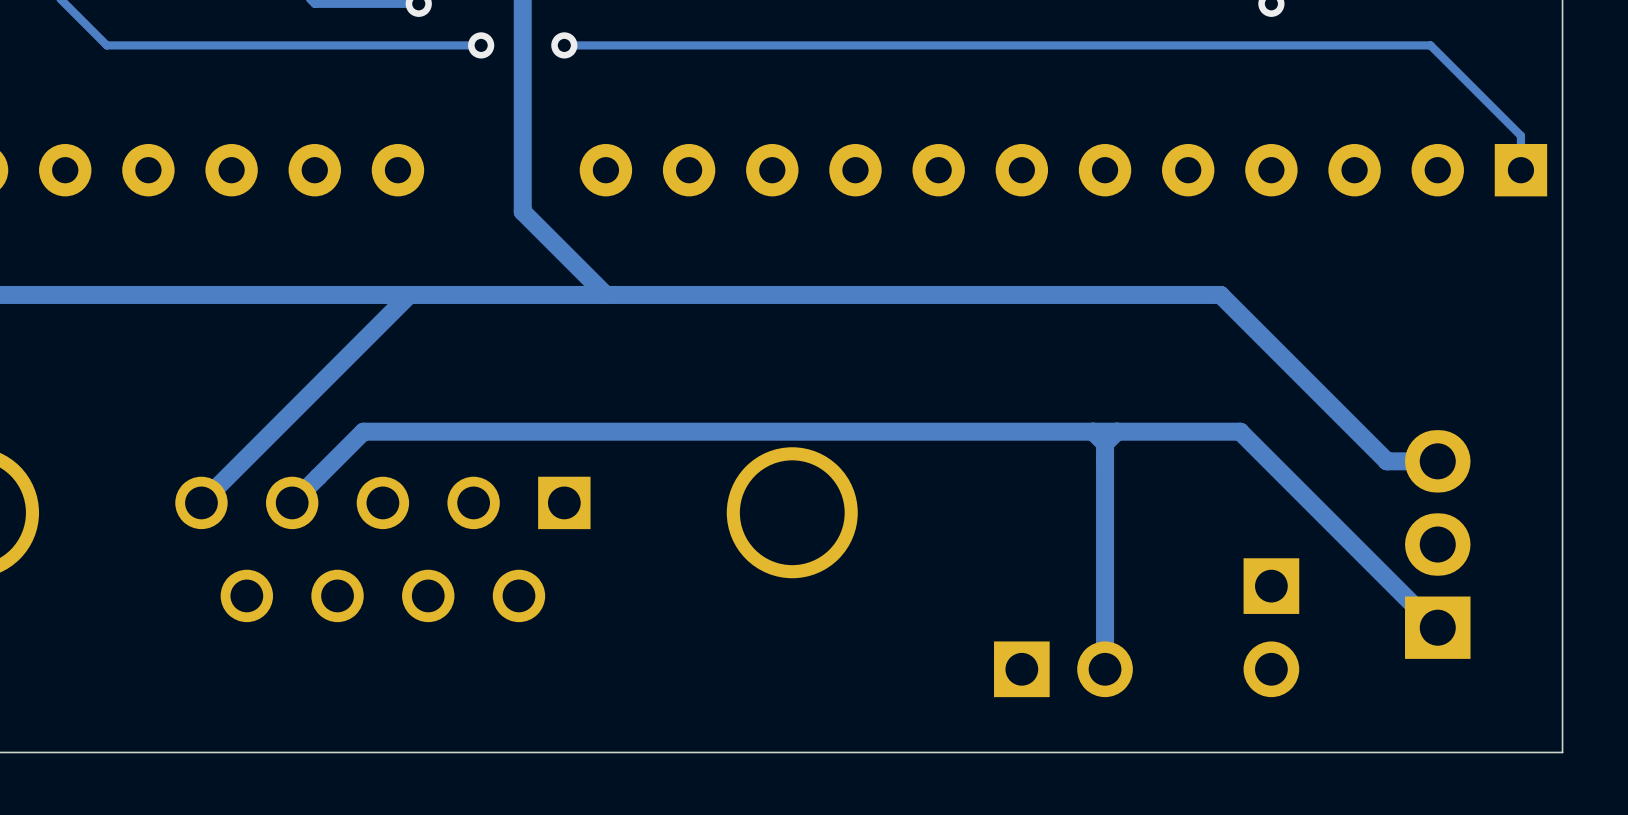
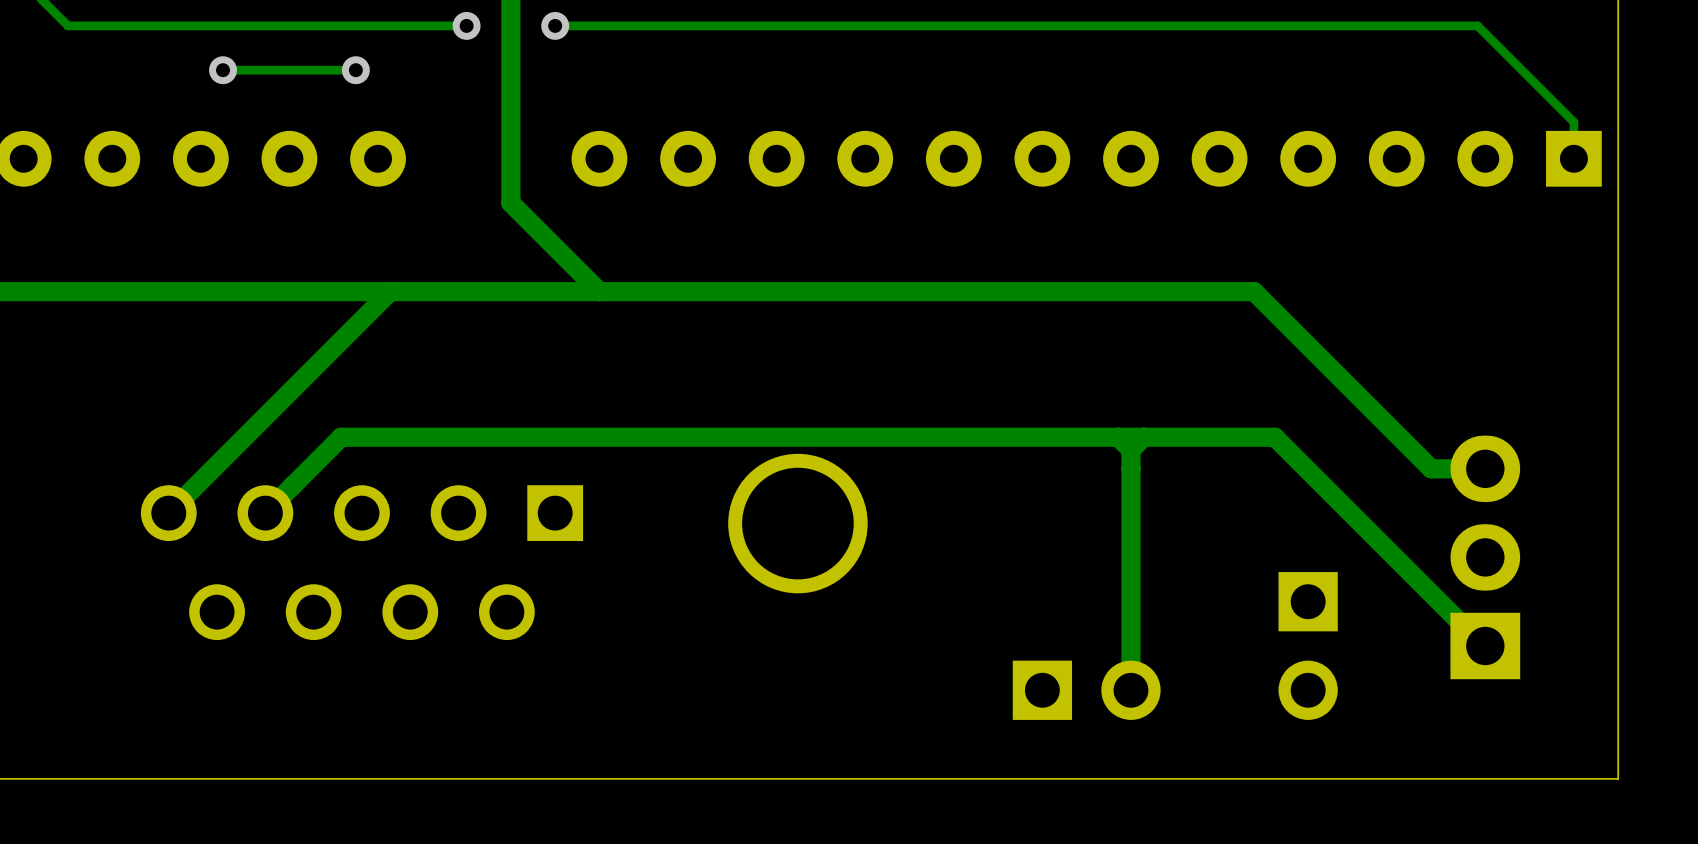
via: none -> (223, 70)
track: none -> (355, 70) (223, 70)
via: none -> (355, 70)

